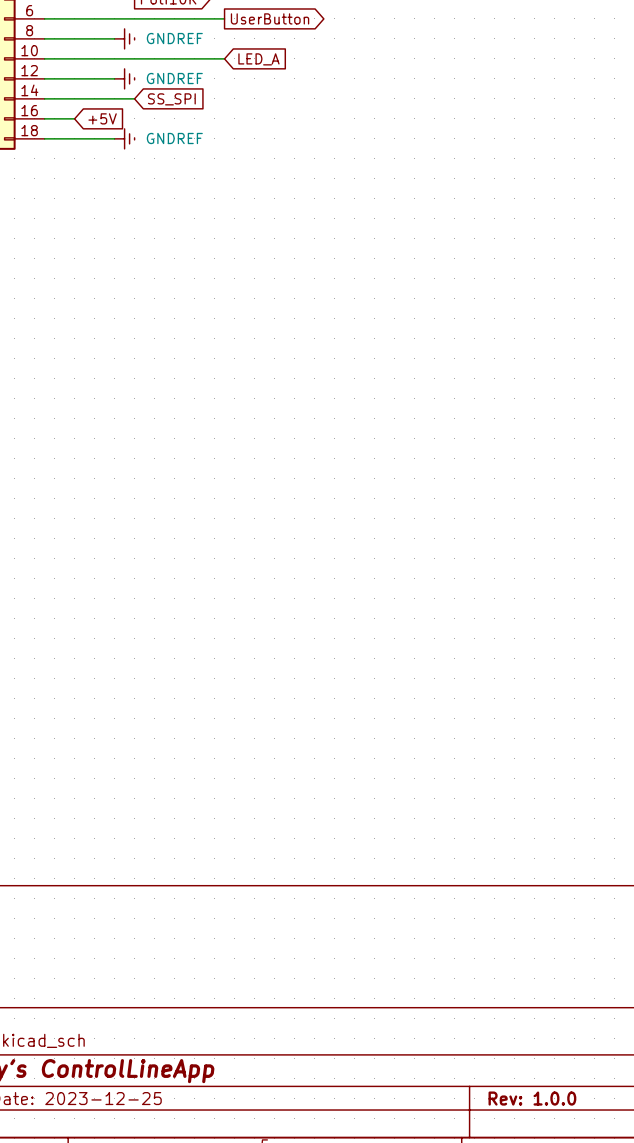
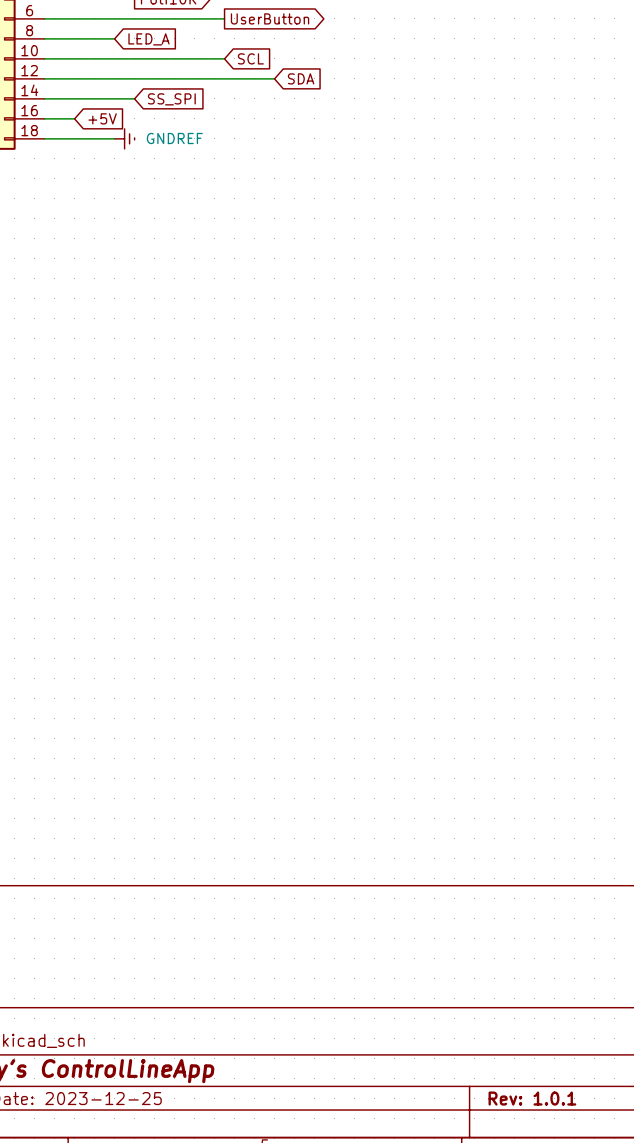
power symbol: GNDREF (124, 38) -> none
global label: none -> LED_A (149, 39)
global label: LED_A (258, 59) -> SCL (250, 58)
wire: none -> (114, 78) (274, 78)
power symbol: GNDREF (124, 78) -> none
global label: none -> SDA (301, 78)
title block: Rev: 1.0.0 (532, 1098) -> Rev: 1.0.1 (532, 1098)

